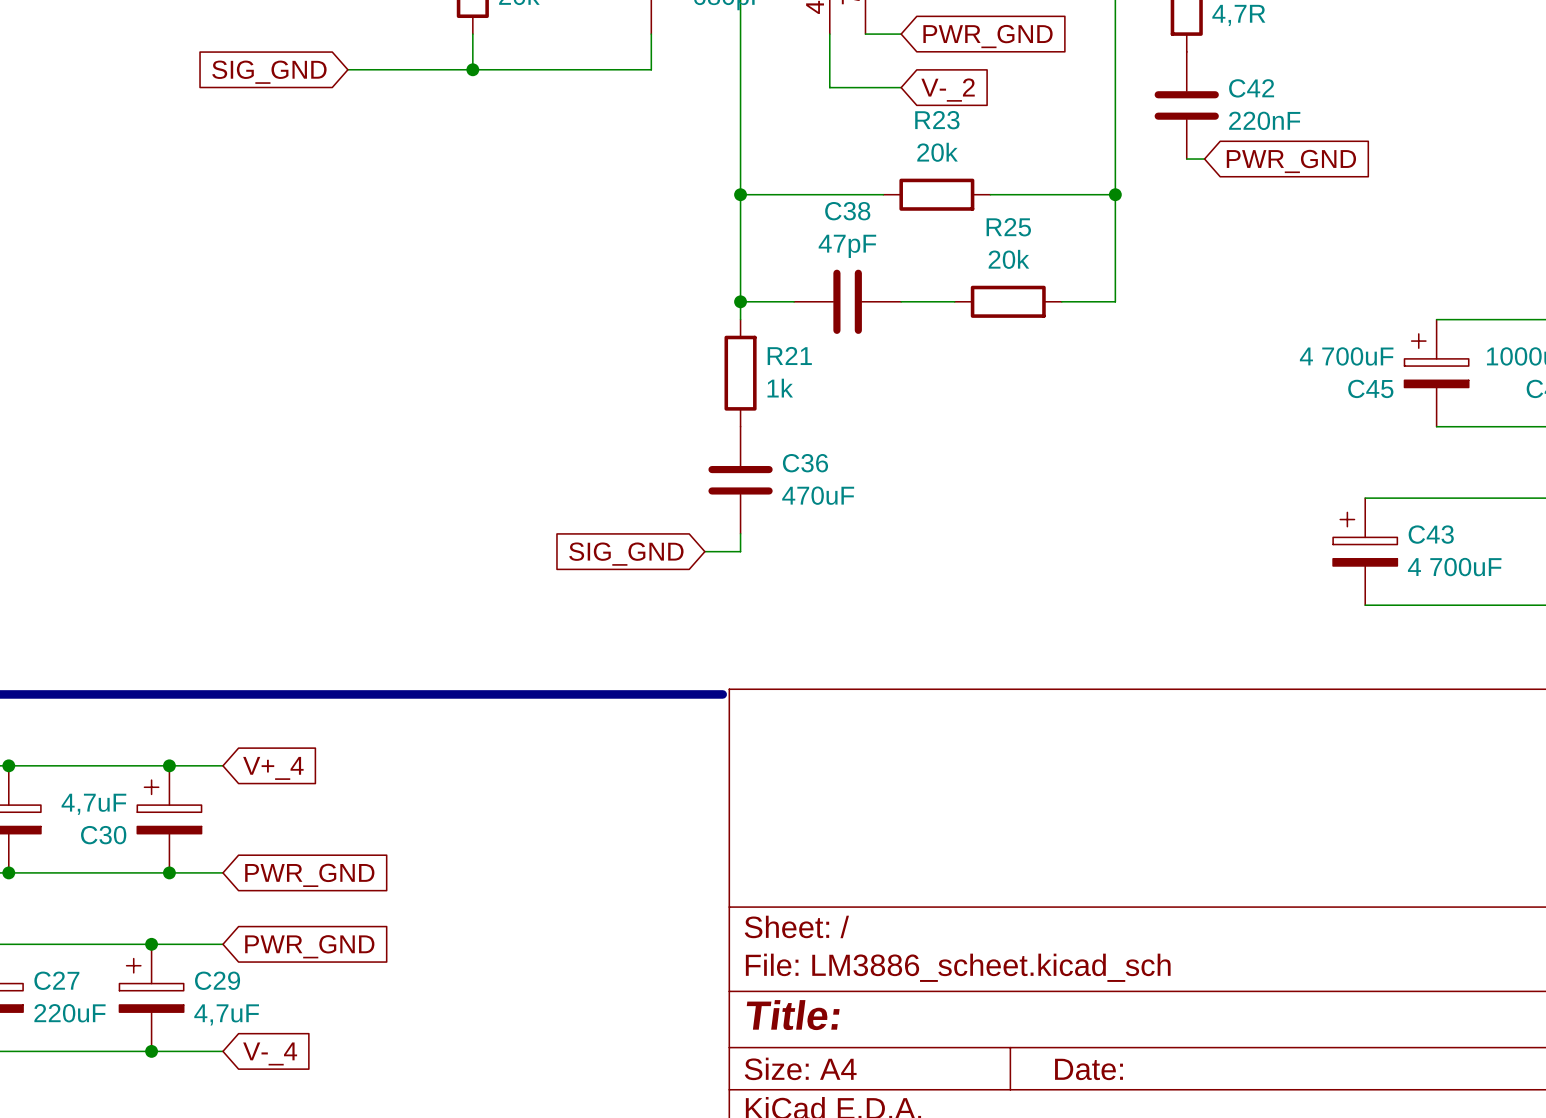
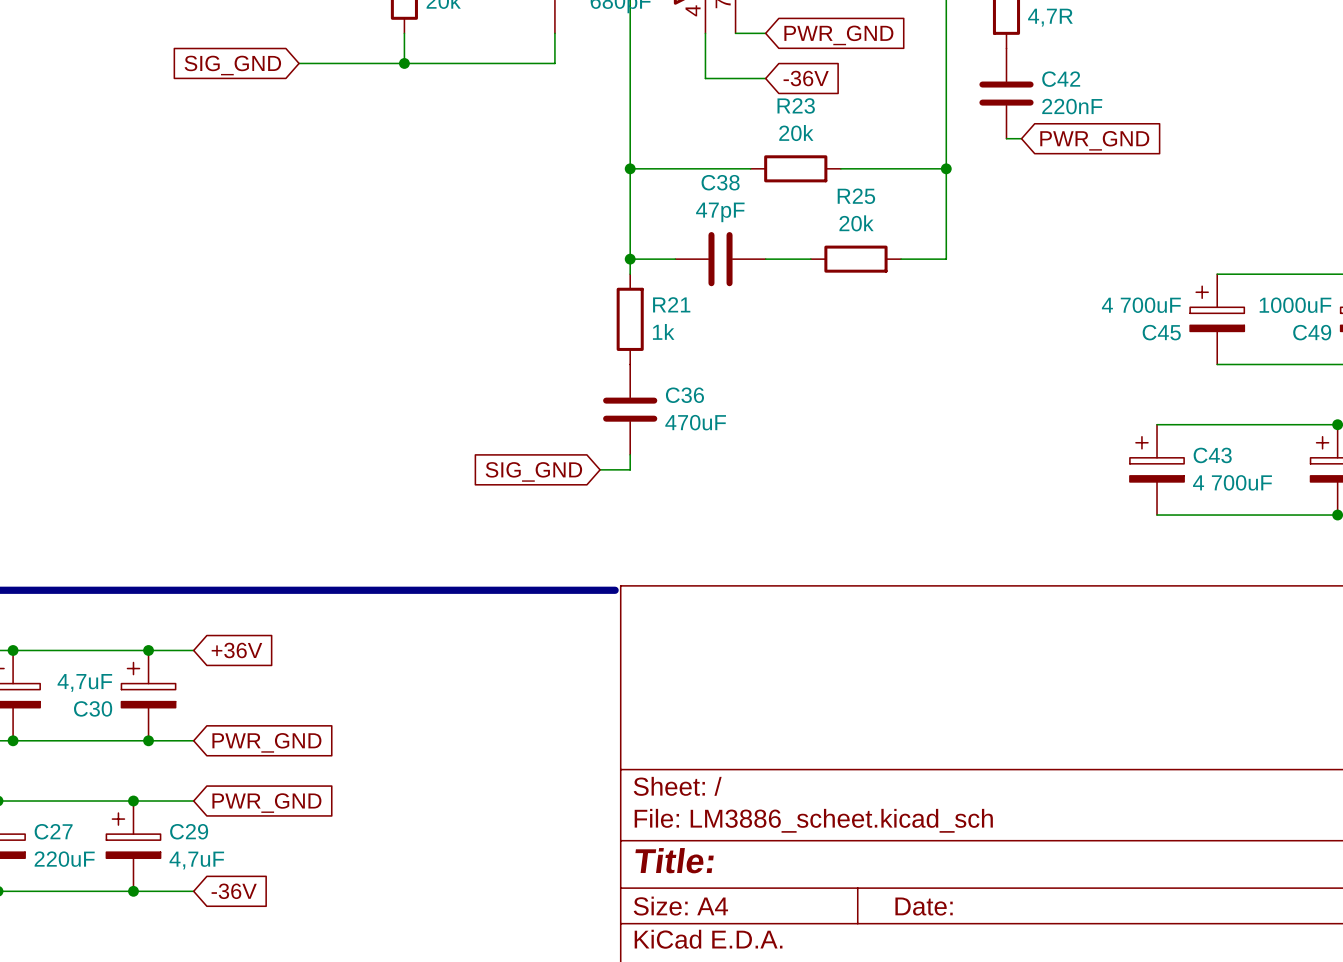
global label: V-_2 (948, 90) -> -36V (806, 78)
global label: V+_4 (273, 768) -> +36V (236, 650)
global label: V-_4 (270, 1053) -> -36V (234, 891)

